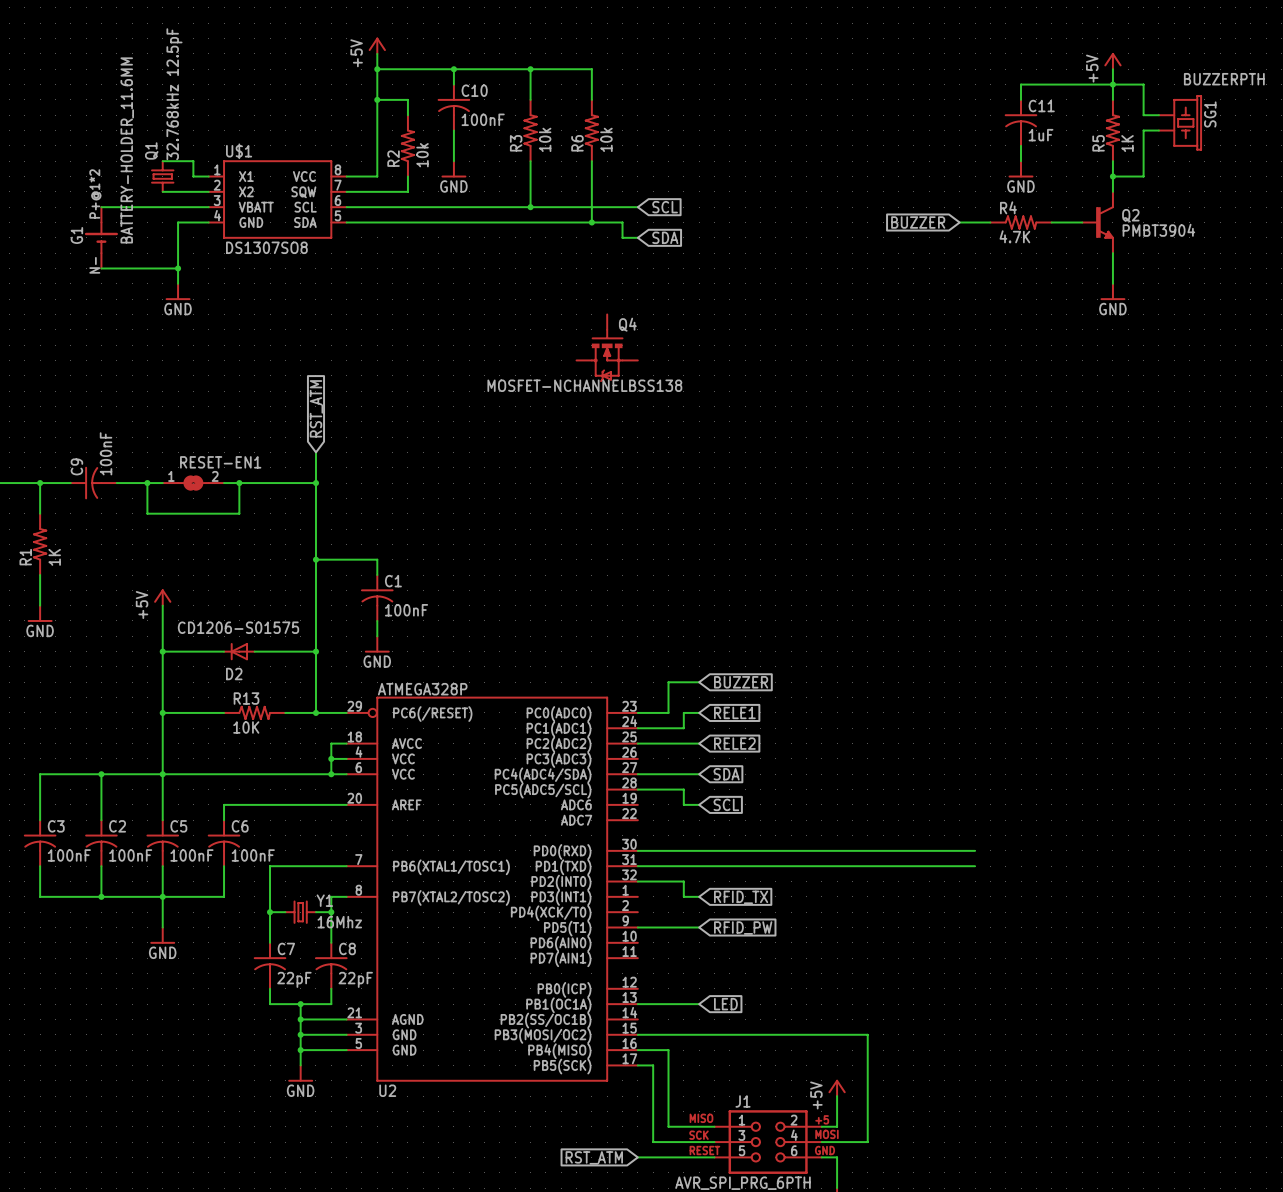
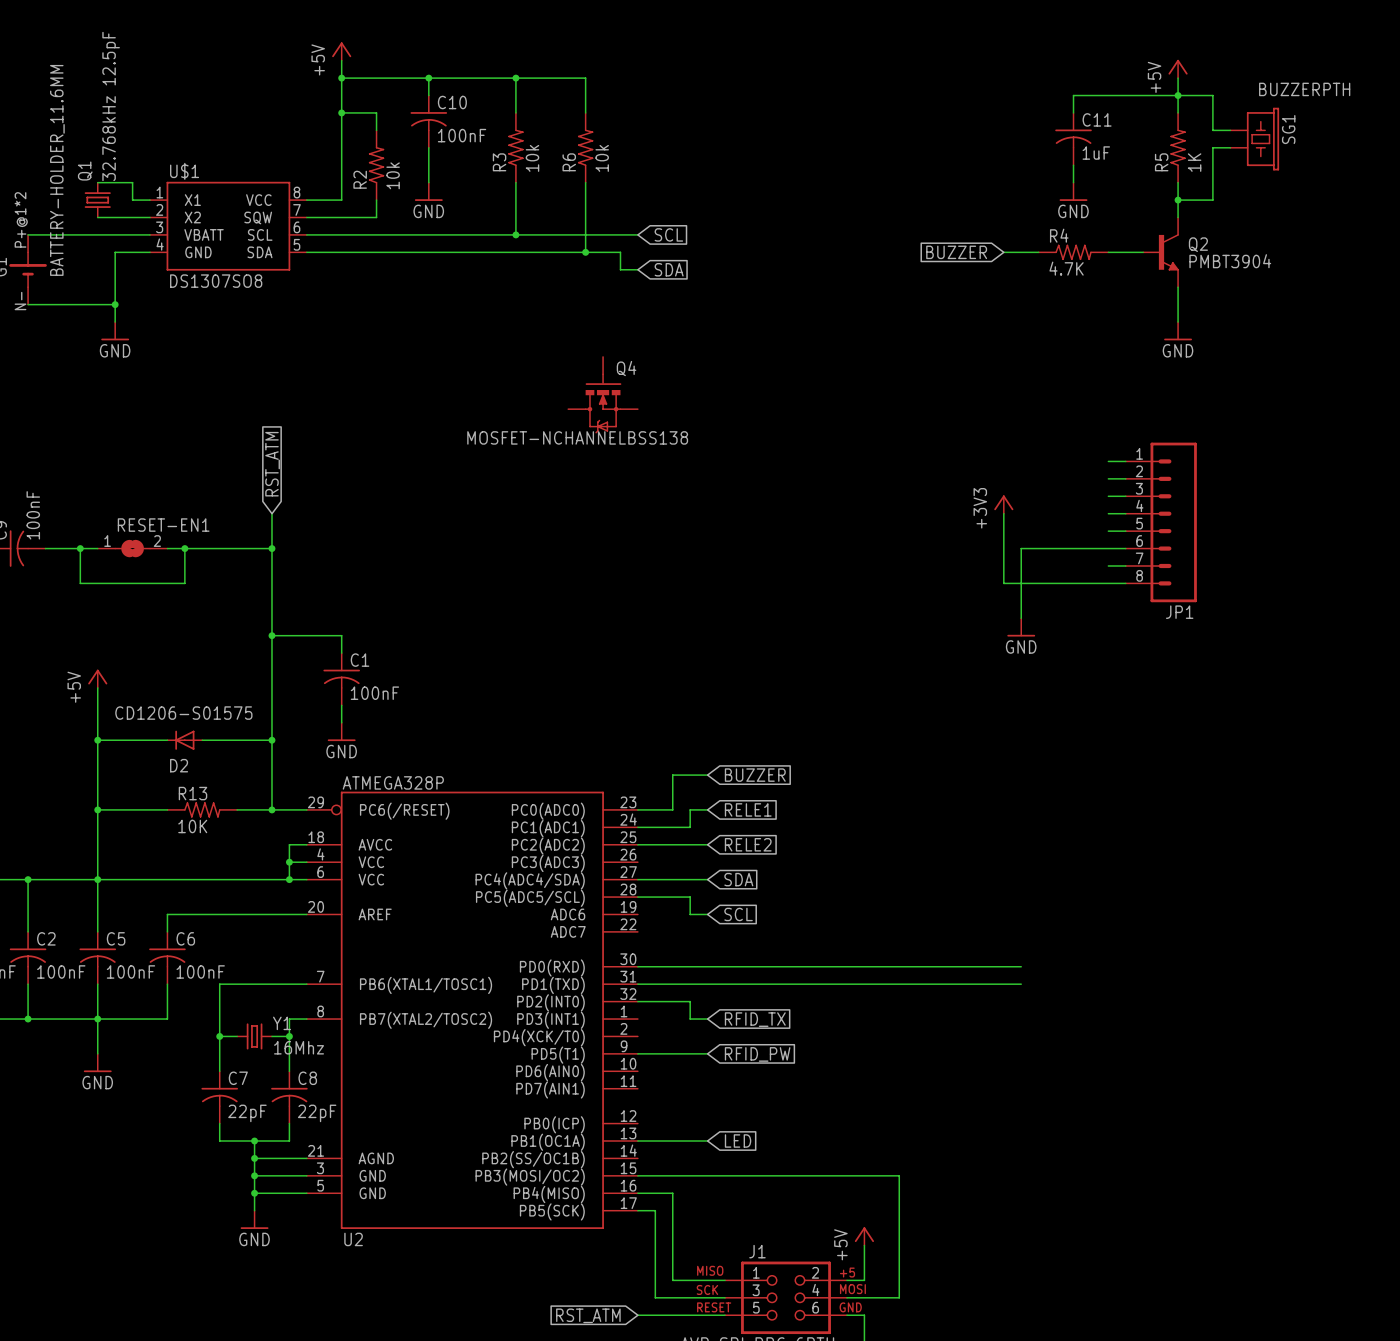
wire: none -> (1108, 461) (1125, 461)
wire: none -> (1108, 478) (1125, 478)
wire: none -> (1108, 496) (1125, 496)
power symbol: none -> +3V3 (1003, 504)
wire: none -> (1003, 513) (1003, 583) (1125, 583)
wire: none -> (1108, 513) (1125, 513)
JP1: none -> (1161, 522)
wire: none -> (1108, 531) (1125, 531)
wire: none -> (1125, 548) (1021, 548) (1021, 618)
wire: none -> (1108, 565) (1125, 565)
power symbol: none -> GND (1021, 627)

